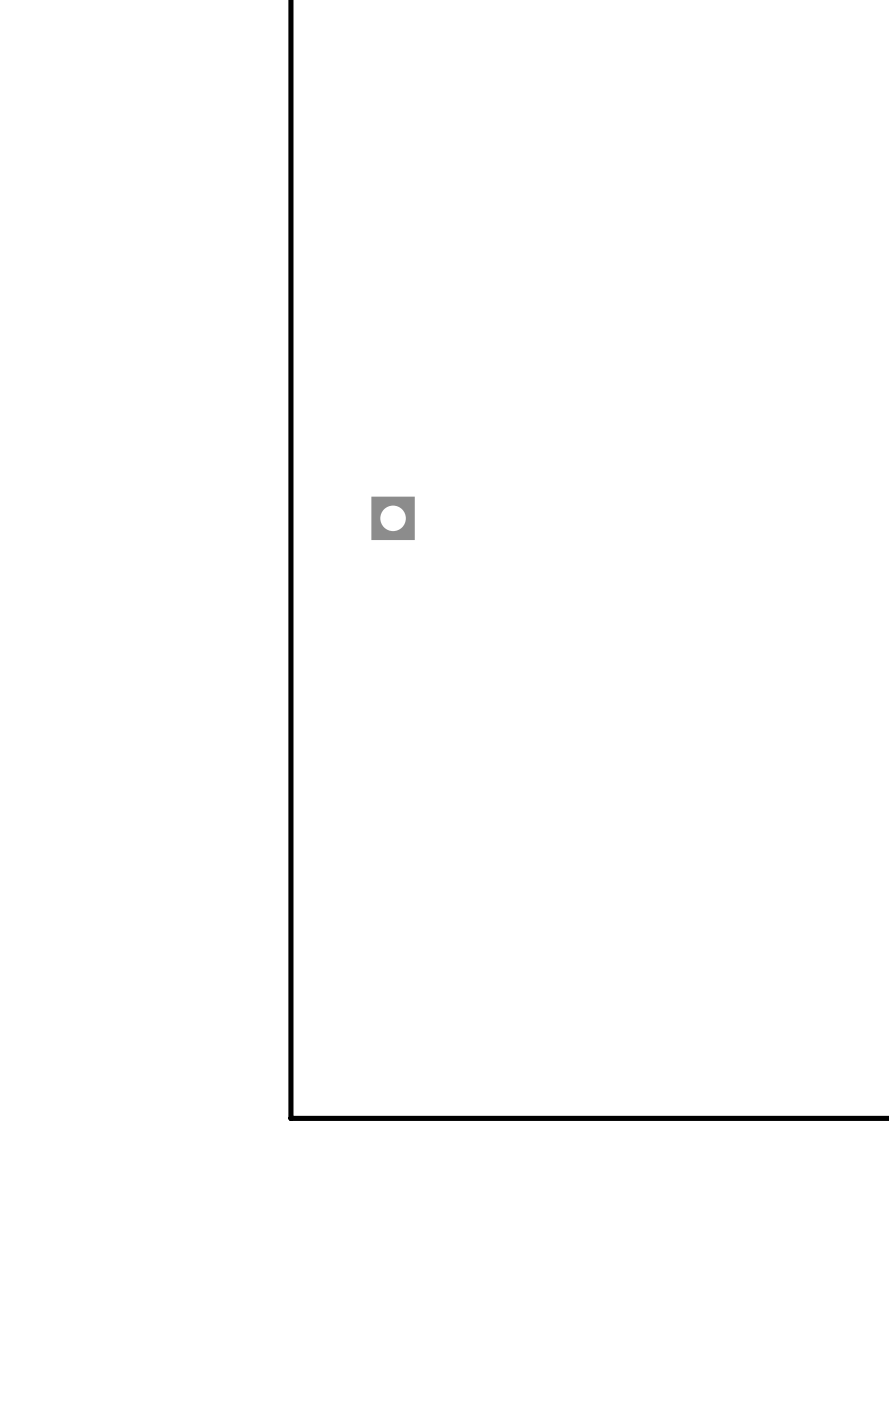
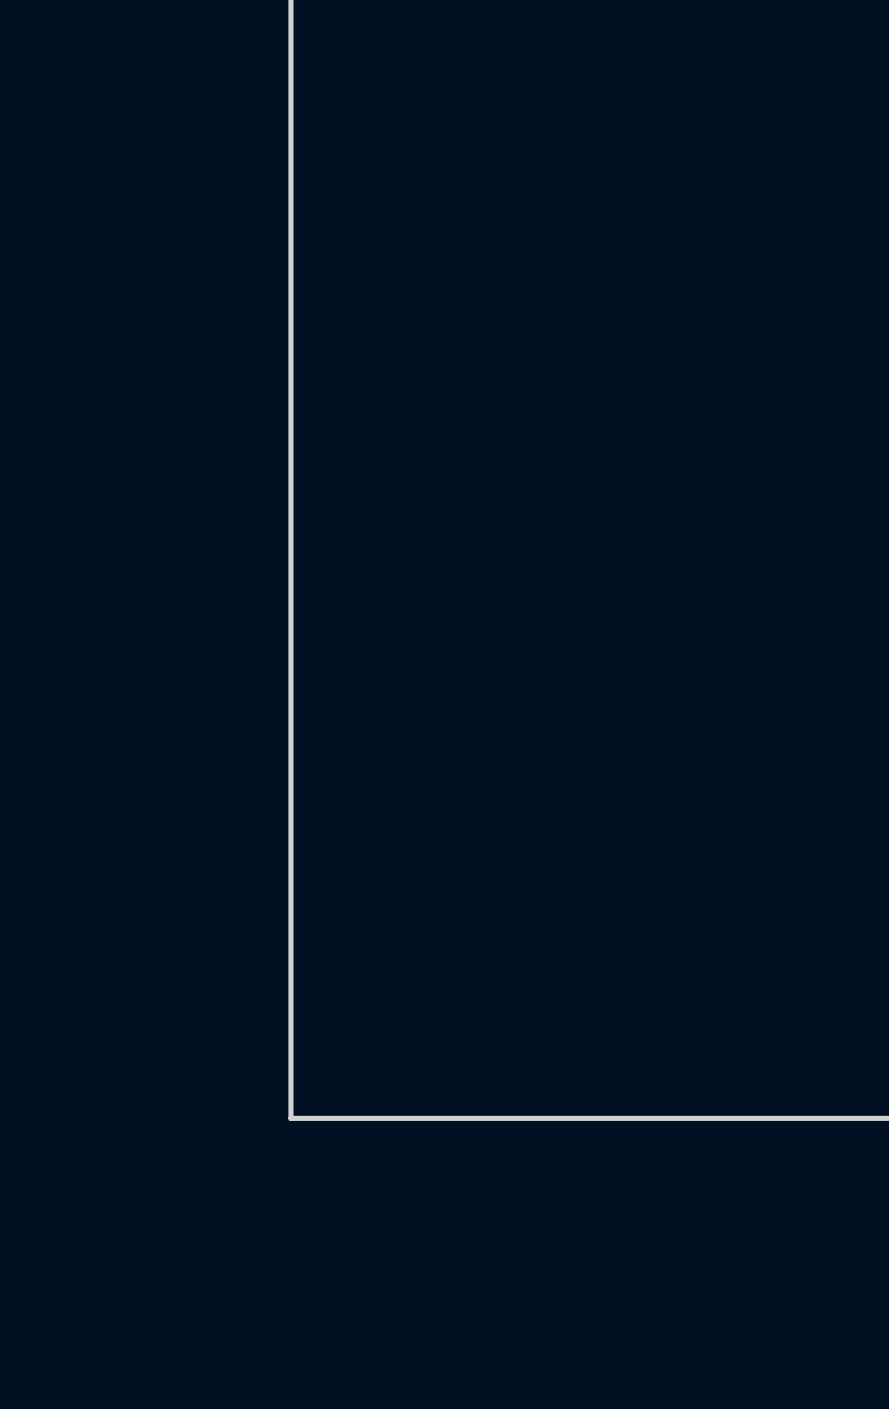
part: (393, 518) -> none

